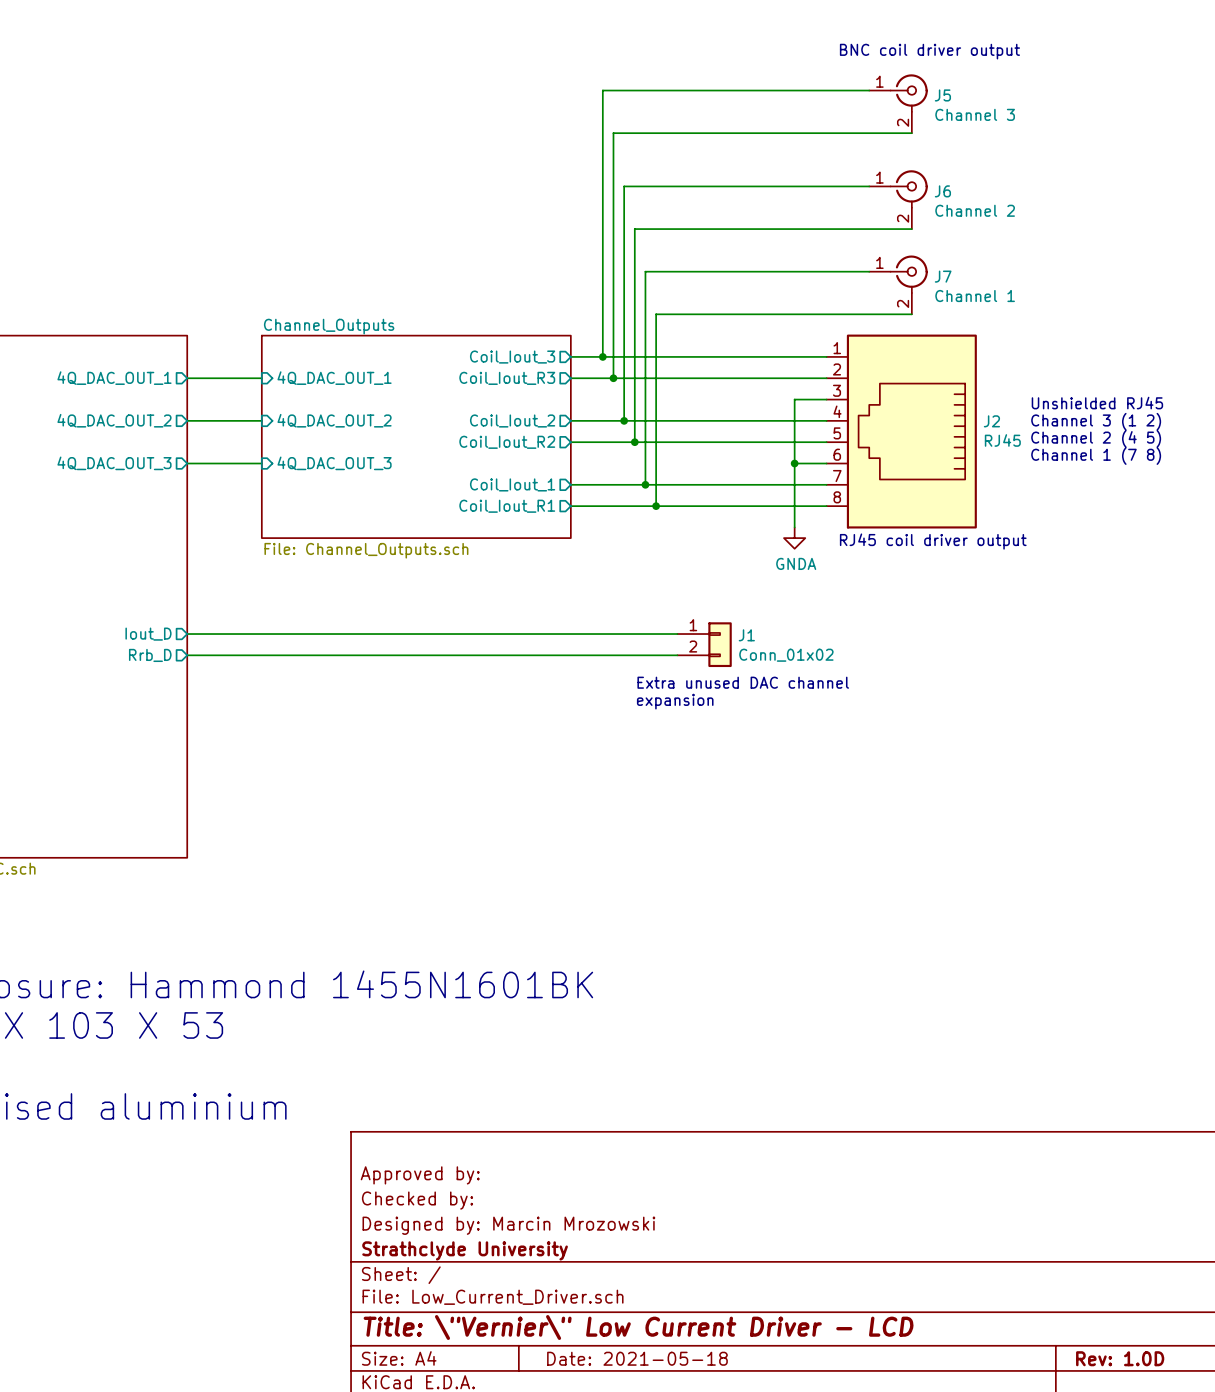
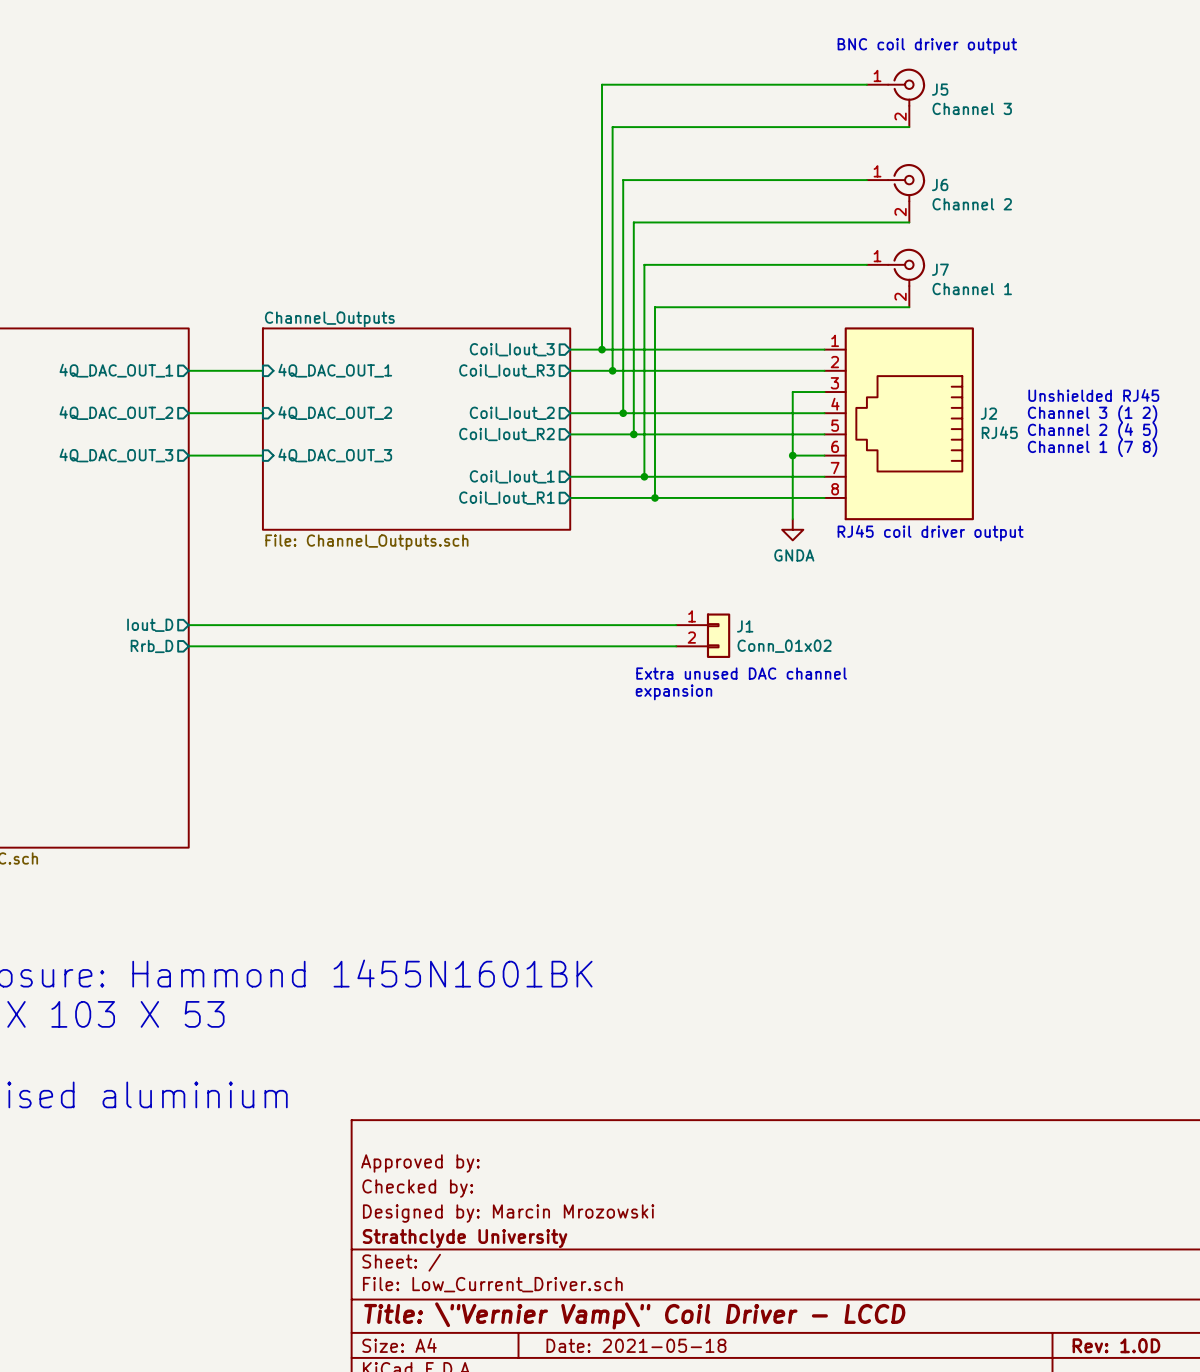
title block: Title: \"Vernier\" Low Current Driver - LCD (638, 1327) -> Title: \"Vernier Vamp\" Coil Driver - LCCD (634, 1315)

